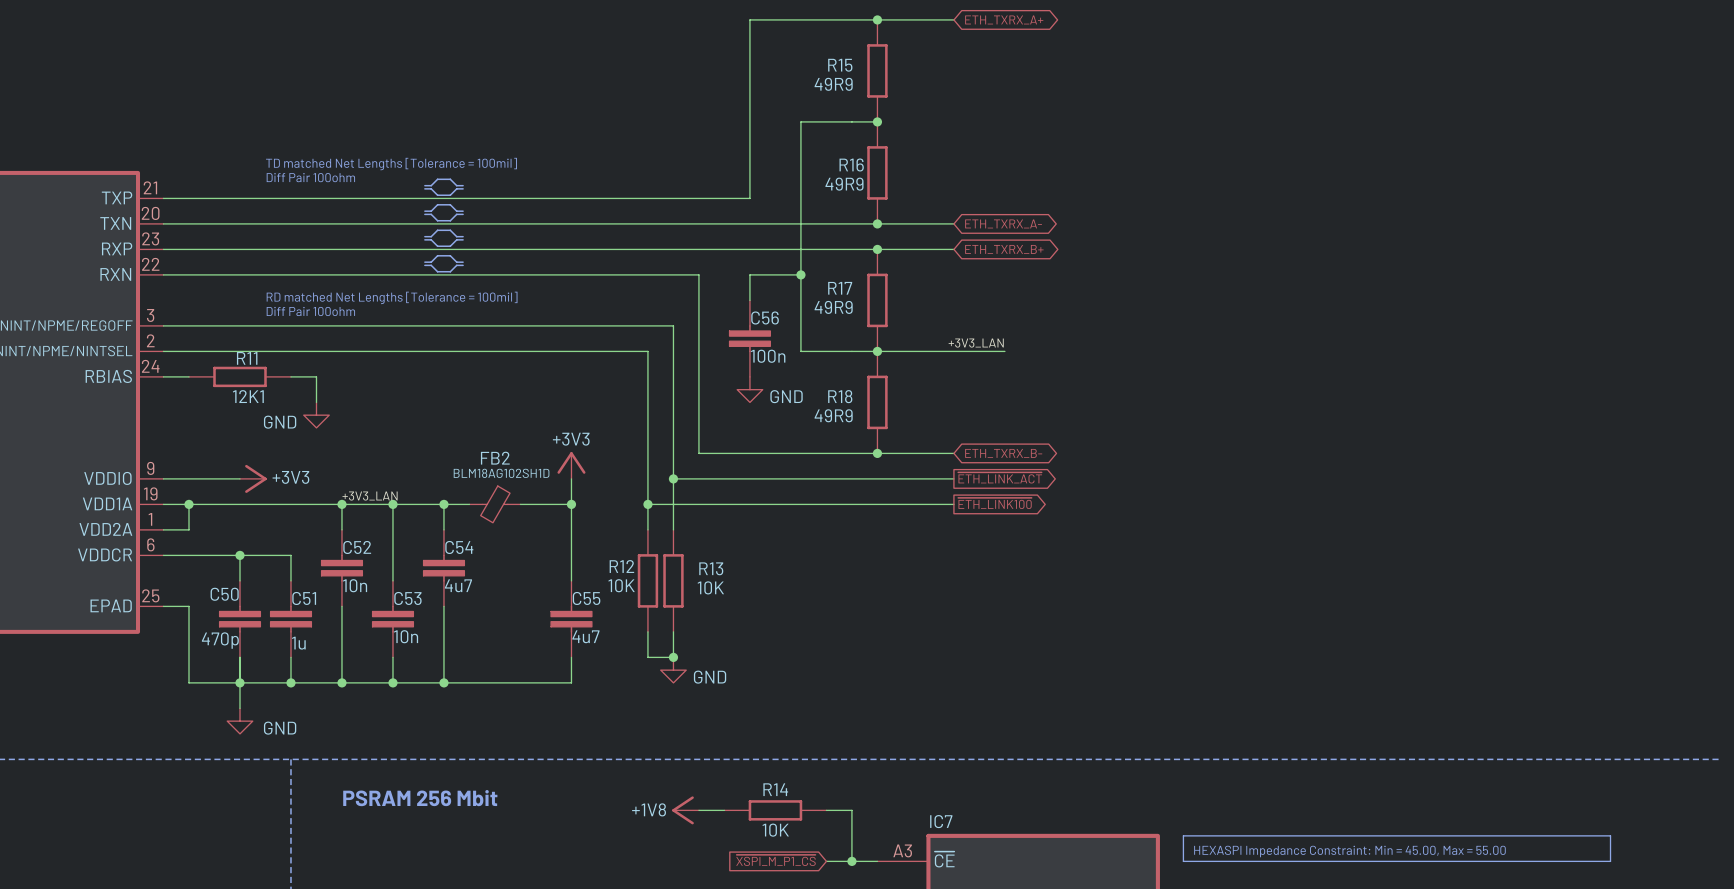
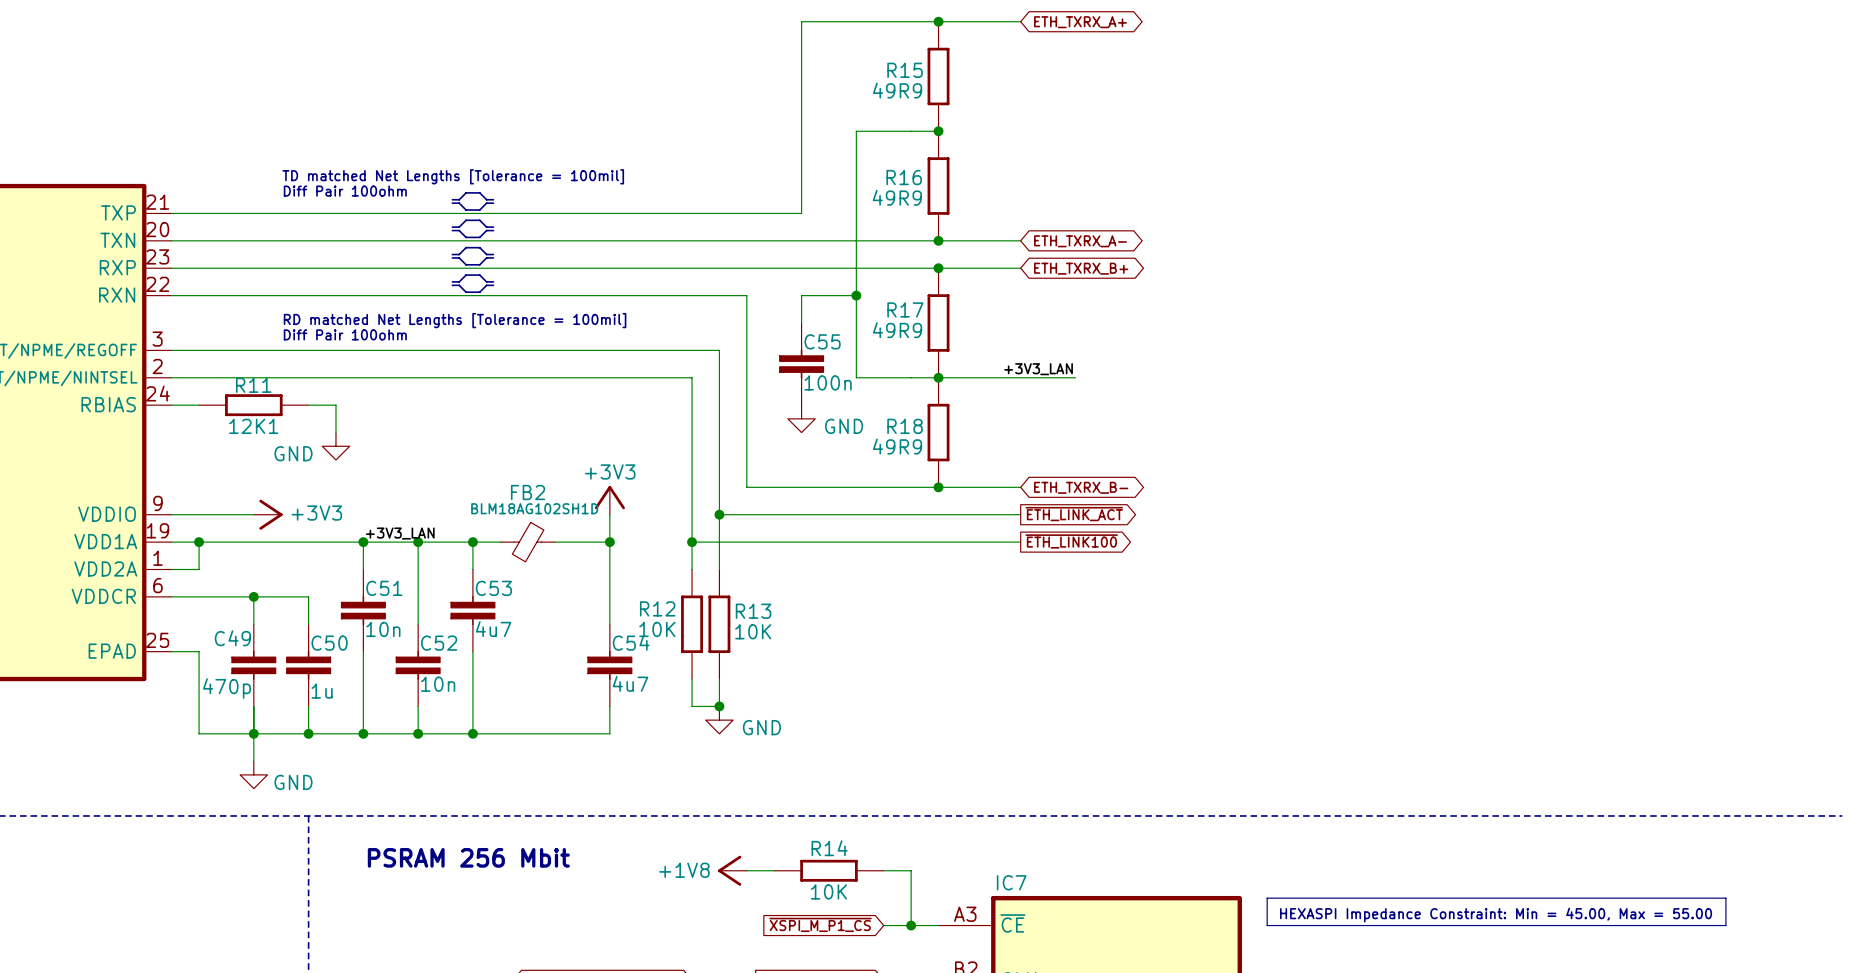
C56 name: C56 (765, 317) -> C55 (822, 341)
C52 name: C52 (357, 547) -> C51 (384, 588)
C54 name: C54 (459, 547) -> C53 (493, 588)
C50 name: C50 (224, 594) -> C49 (232, 638)
C51 name: C51 (304, 598) -> C50 (329, 643)
C53 name: C53 (407, 598) -> C52 (439, 643)
C55 name: C55 (586, 598) -> C54 (631, 642)

